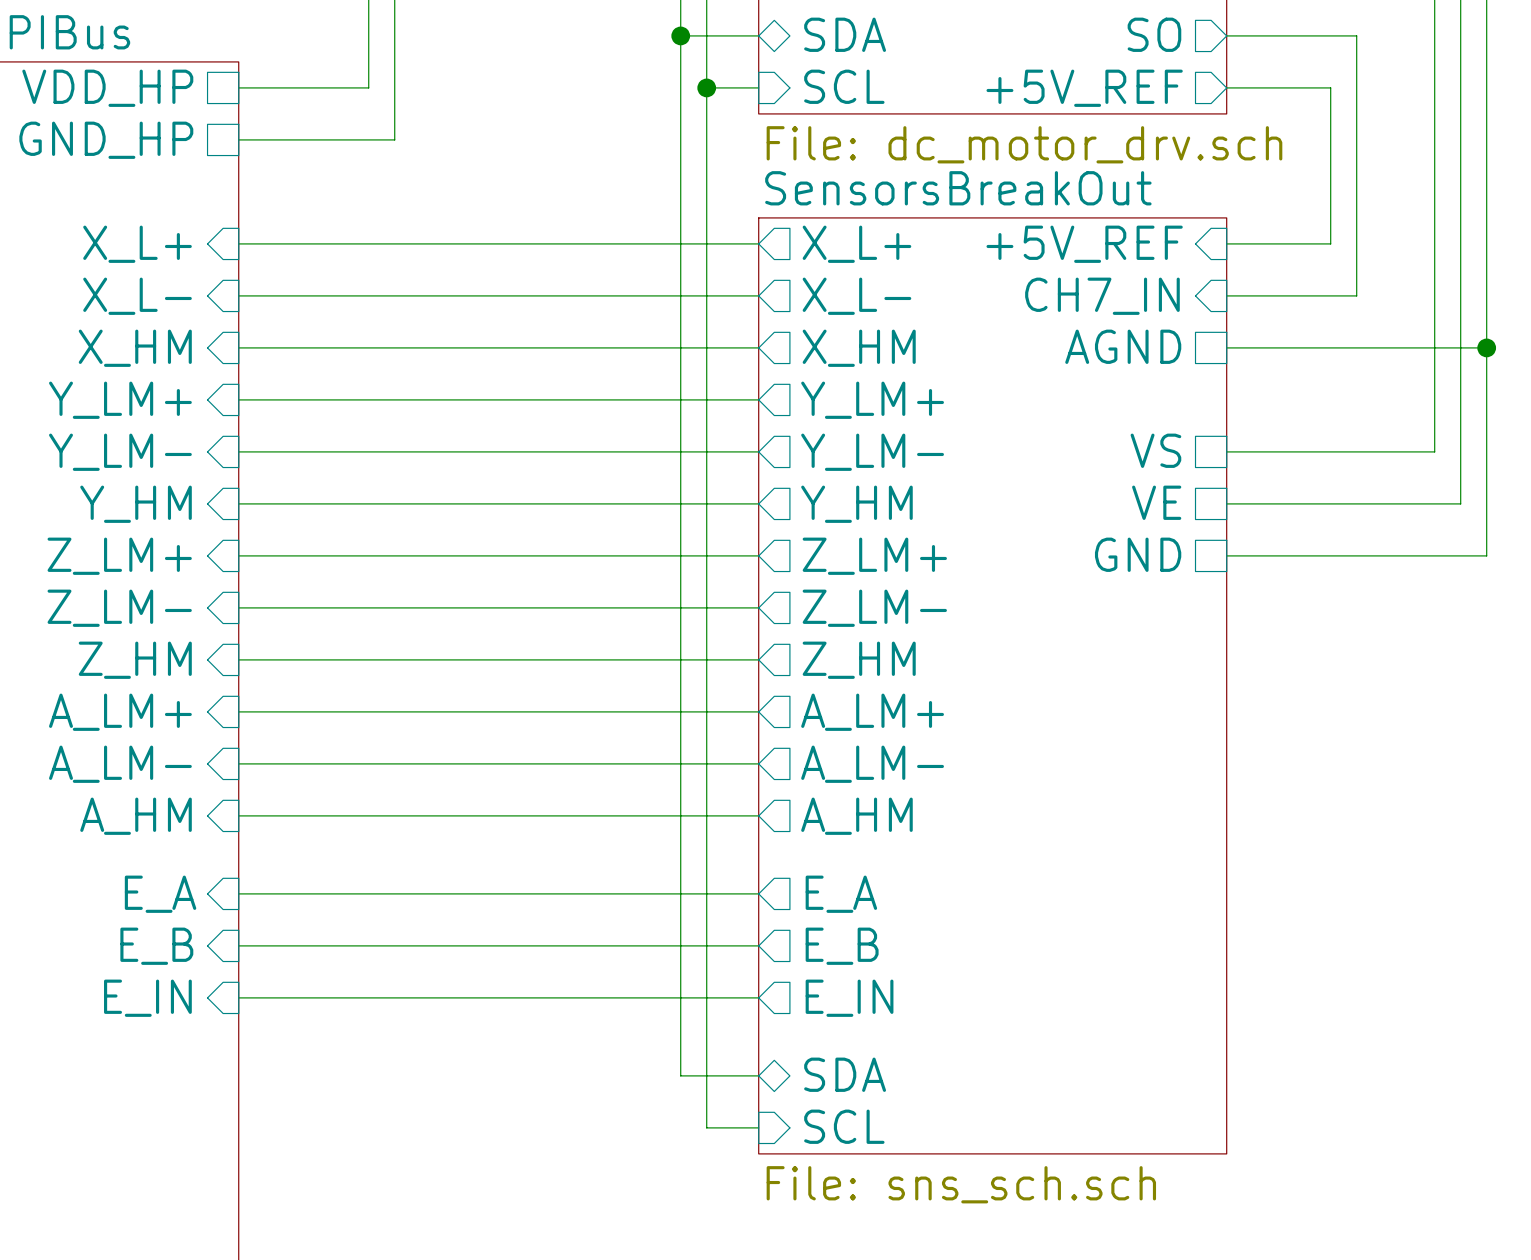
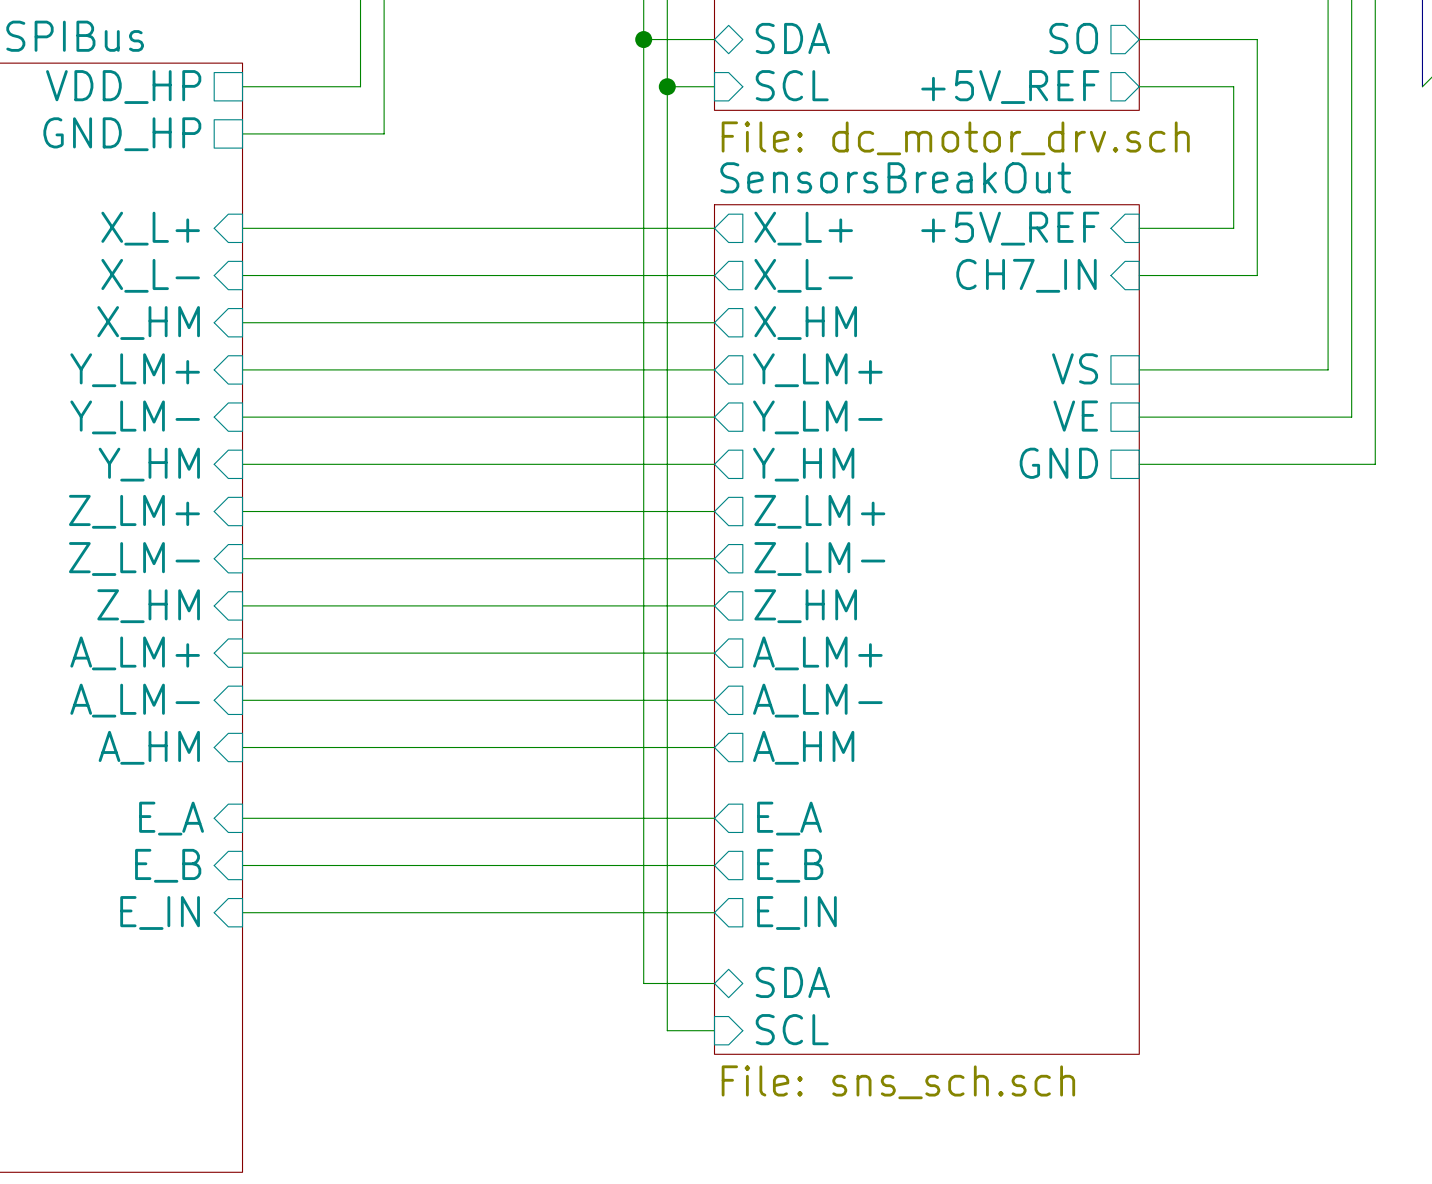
sheet pin: AGND (1123, 346) -> none
wire: (1226, 347) (1486, 347) -> none
junction: (1486, 347) -> none
sheet pin: none -> VS (1075, 368)
wire: none -> (1139, 369) (1328, 369)
wire: (1434, 399) (1434, 451) -> (1351, 417) (1328, 417)
sheet pin: VS (1155, 450) -> VE (1075, 416)
wire: (1460, 451) (1460, 503) -> (1375, 464) (1351, 464)
sheet pin: VE (1156, 502) -> GND (1058, 463)
wire: (1486, 503) (1486, 555) (1226, 555) -> none
sheet pin: GND (1138, 554) -> none

